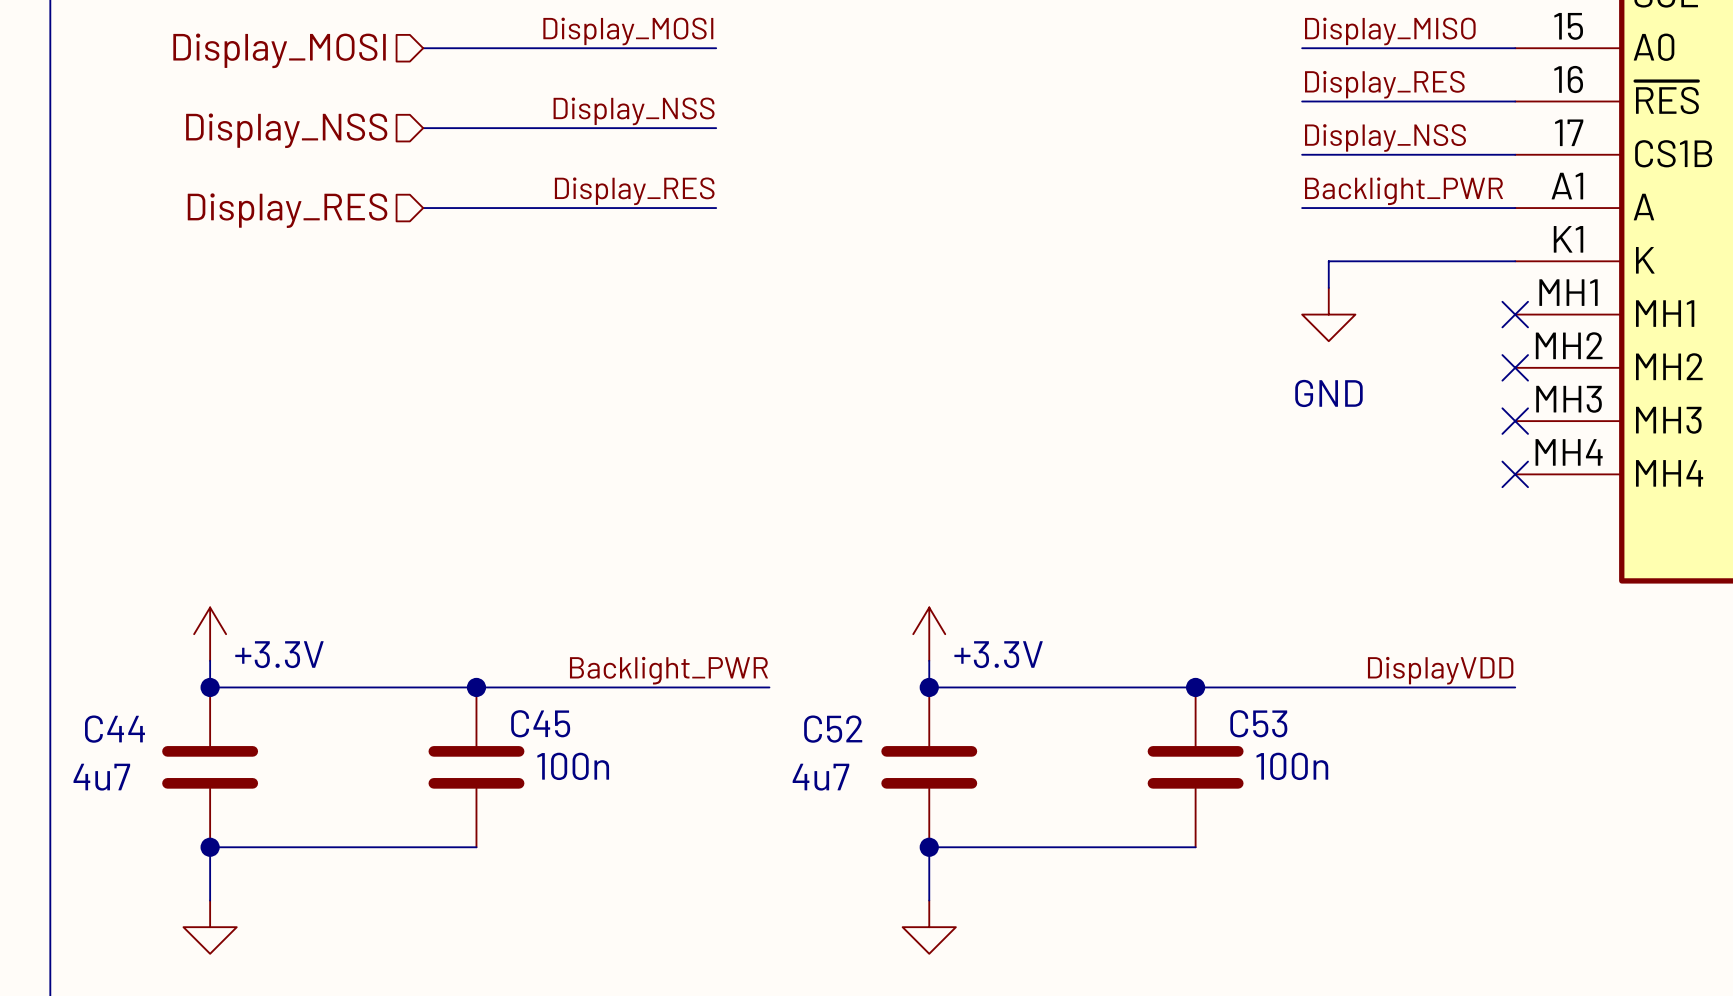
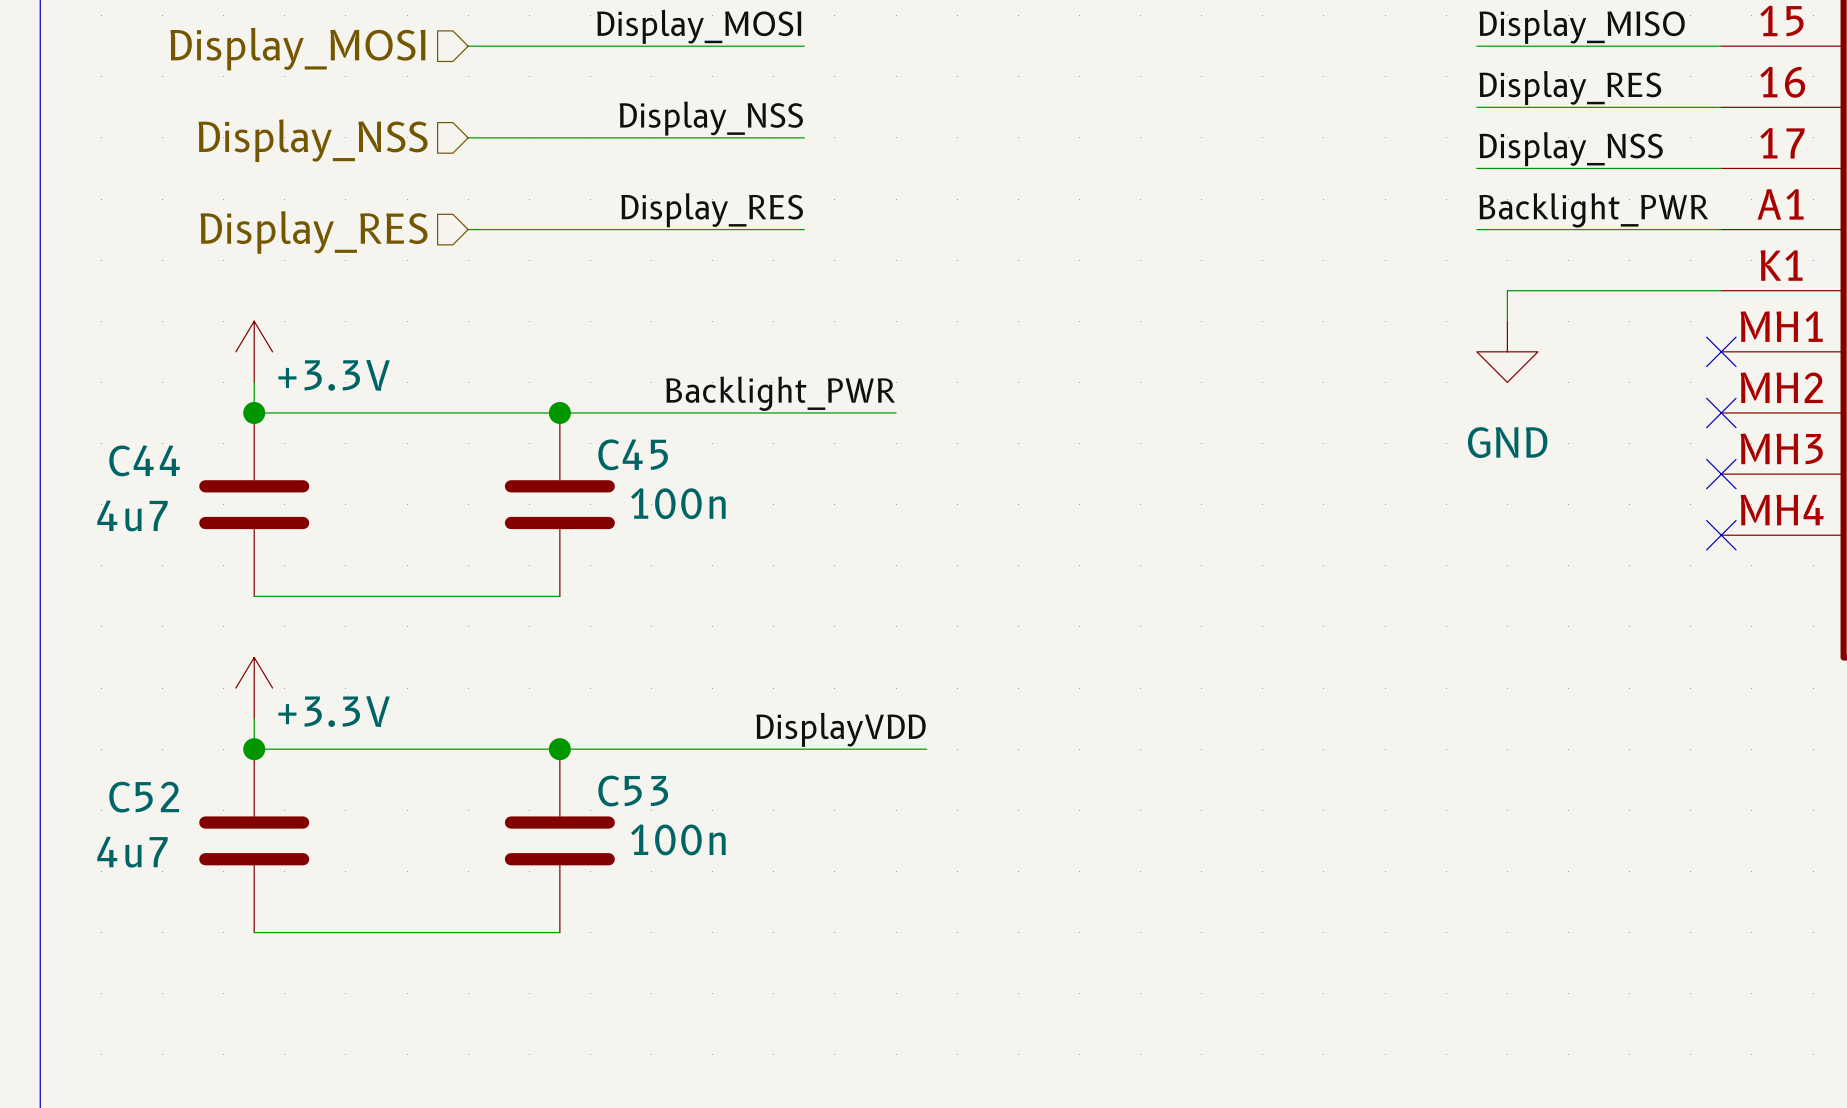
power symbol: none -> +3.3V (254, 351)
junction: none -> (254, 412)
junction: none -> (559, 412)
wire: none -> (254, 596) (559, 596)
power symbol position: +3.3V (210, 634) -> +3.3V (254, 688)
wire: none -> (254, 718) (254, 749) (926, 749)
power symbol: +3.3V (929, 634) -> none
label: none -> DisplayVDD (841, 729)
wire: (210, 660) (210, 687) (769, 687) -> (254, 382) (254, 412) (896, 412)
wire: (929, 660) (929, 687) (1515, 687) -> none
label position: Backlight_PWR (668, 670) -> Backlight_PWR (780, 393)
label: DisplayVDD (1440, 670) -> none
junction position: (210, 687) -> (254, 749)
junction position: (476, 687) -> (559, 749)
junction: (929, 687) -> none
junction: (1195, 687) -> none
C44 position: (210, 767) -> (254, 504)
C45 position: (476, 767) -> (559, 504)
C52 position: (929, 767) -> (254, 840)
C53 position: (1195, 767) -> (559, 840)
wire: none -> (254, 932) (559, 932)
junction: (210, 847) -> none
wire: (476, 847) (210, 847) (210, 900) -> none
junction: (929, 847) -> none
wire: (1195, 847) (929, 847) (929, 900) -> none
power symbol: (210, 927) -> none
power symbol: (929, 927) -> none

